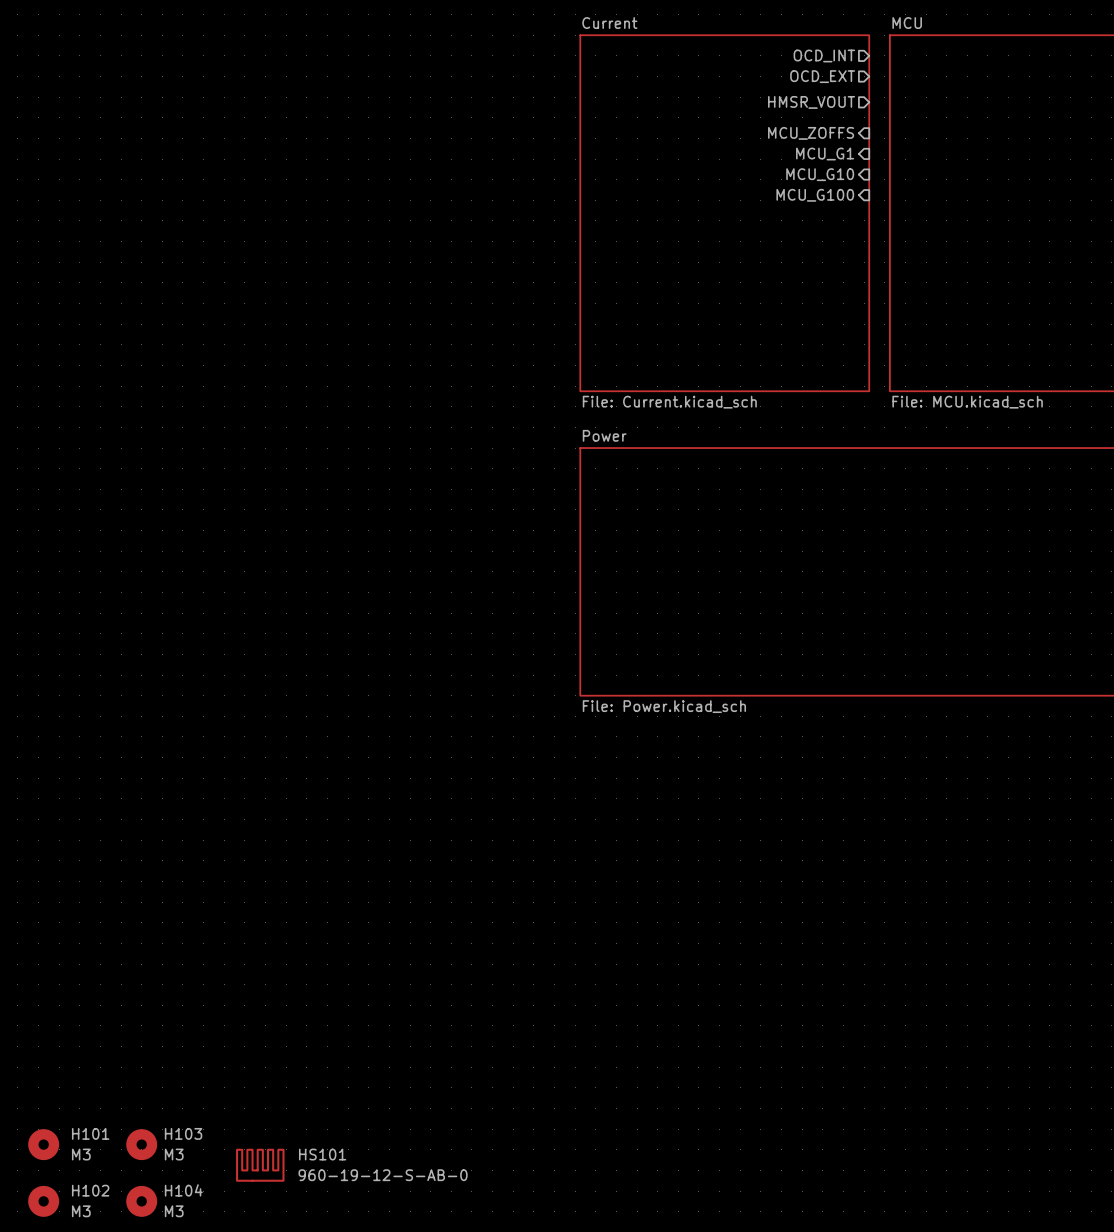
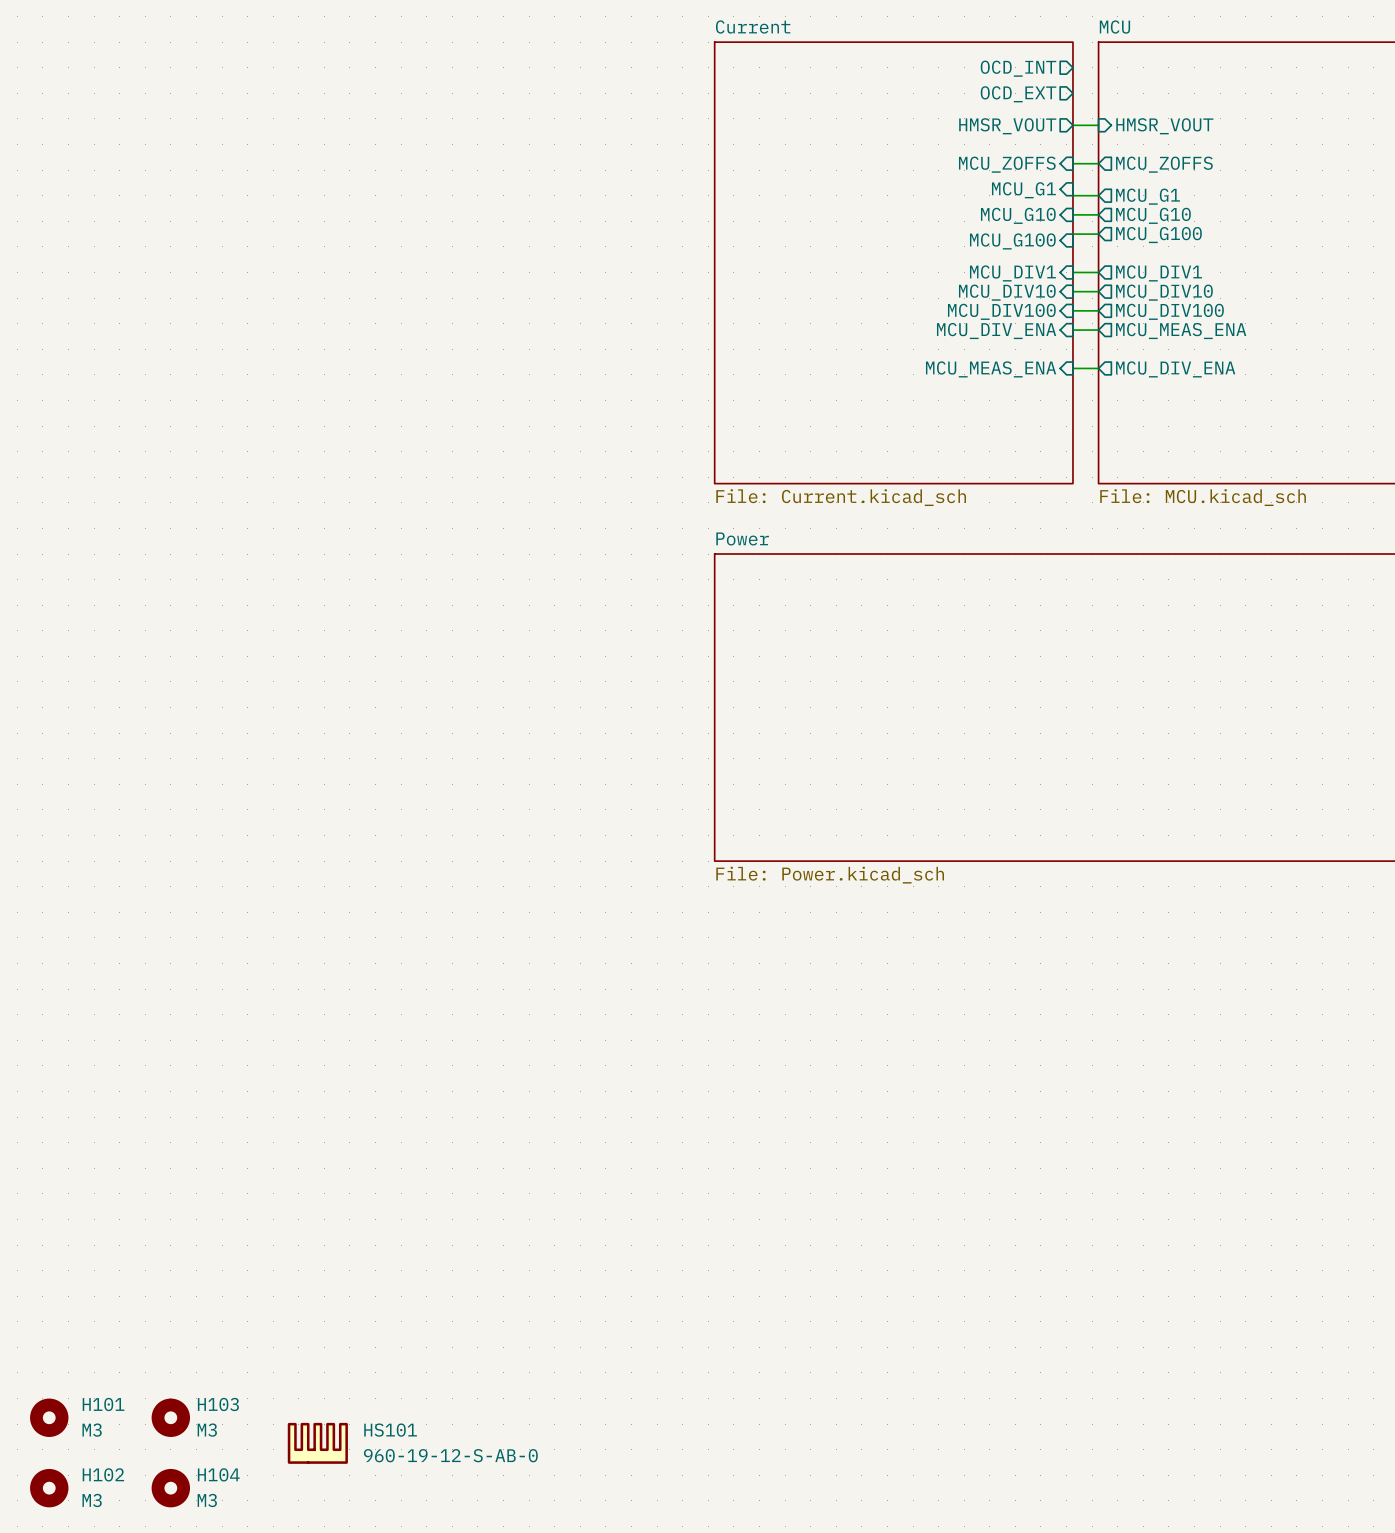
wire: none -> (1072, 125) (1098, 125)
sheet pin: none -> HMSR_VOUT (1164, 126)
wire: none -> (1072, 163) (1098, 163)
sheet pin: none -> MCU_ZOFFS (1164, 164)
wire: none -> (1072, 195) (1098, 195)
sheet pin: none -> MCU_G1 (1148, 196)
wire: none -> (1072, 214) (1098, 214)
sheet pin: none -> MCU_G10 (1153, 215)
wire: none -> (1072, 234) (1098, 234)
sheet pin: none -> MCU_G100 (1158, 235)
wire: none -> (1072, 272) (1098, 272)
sheet pin: none -> MCU_DIV1 (1012, 273)
sheet pin: none -> MCU_DIV1 (1159, 273)
sheet pin: none -> MCU_DIV10 (1007, 292)
wire: none -> (1072, 291) (1098, 291)
sheet pin: none -> MCU_DIV10 (1164, 292)
wire: none -> (1072, 310) (1098, 310)
sheet pin: none -> MCU_DIV100 (1001, 311)
sheet pin: none -> MCU_DIV100 (1169, 311)
sheet pin: none -> MCU_DIV_ENA (996, 331)
wire: none -> (1072, 330) (1098, 330)
sheet pin: none -> MCU_MEAS_ENA (1181, 331)
sheet pin: none -> MCU_MEAS_ENA (991, 369)
wire: none -> (1072, 368) (1098, 368)
sheet pin: none -> MCU_DIV_ENA (1175, 369)

